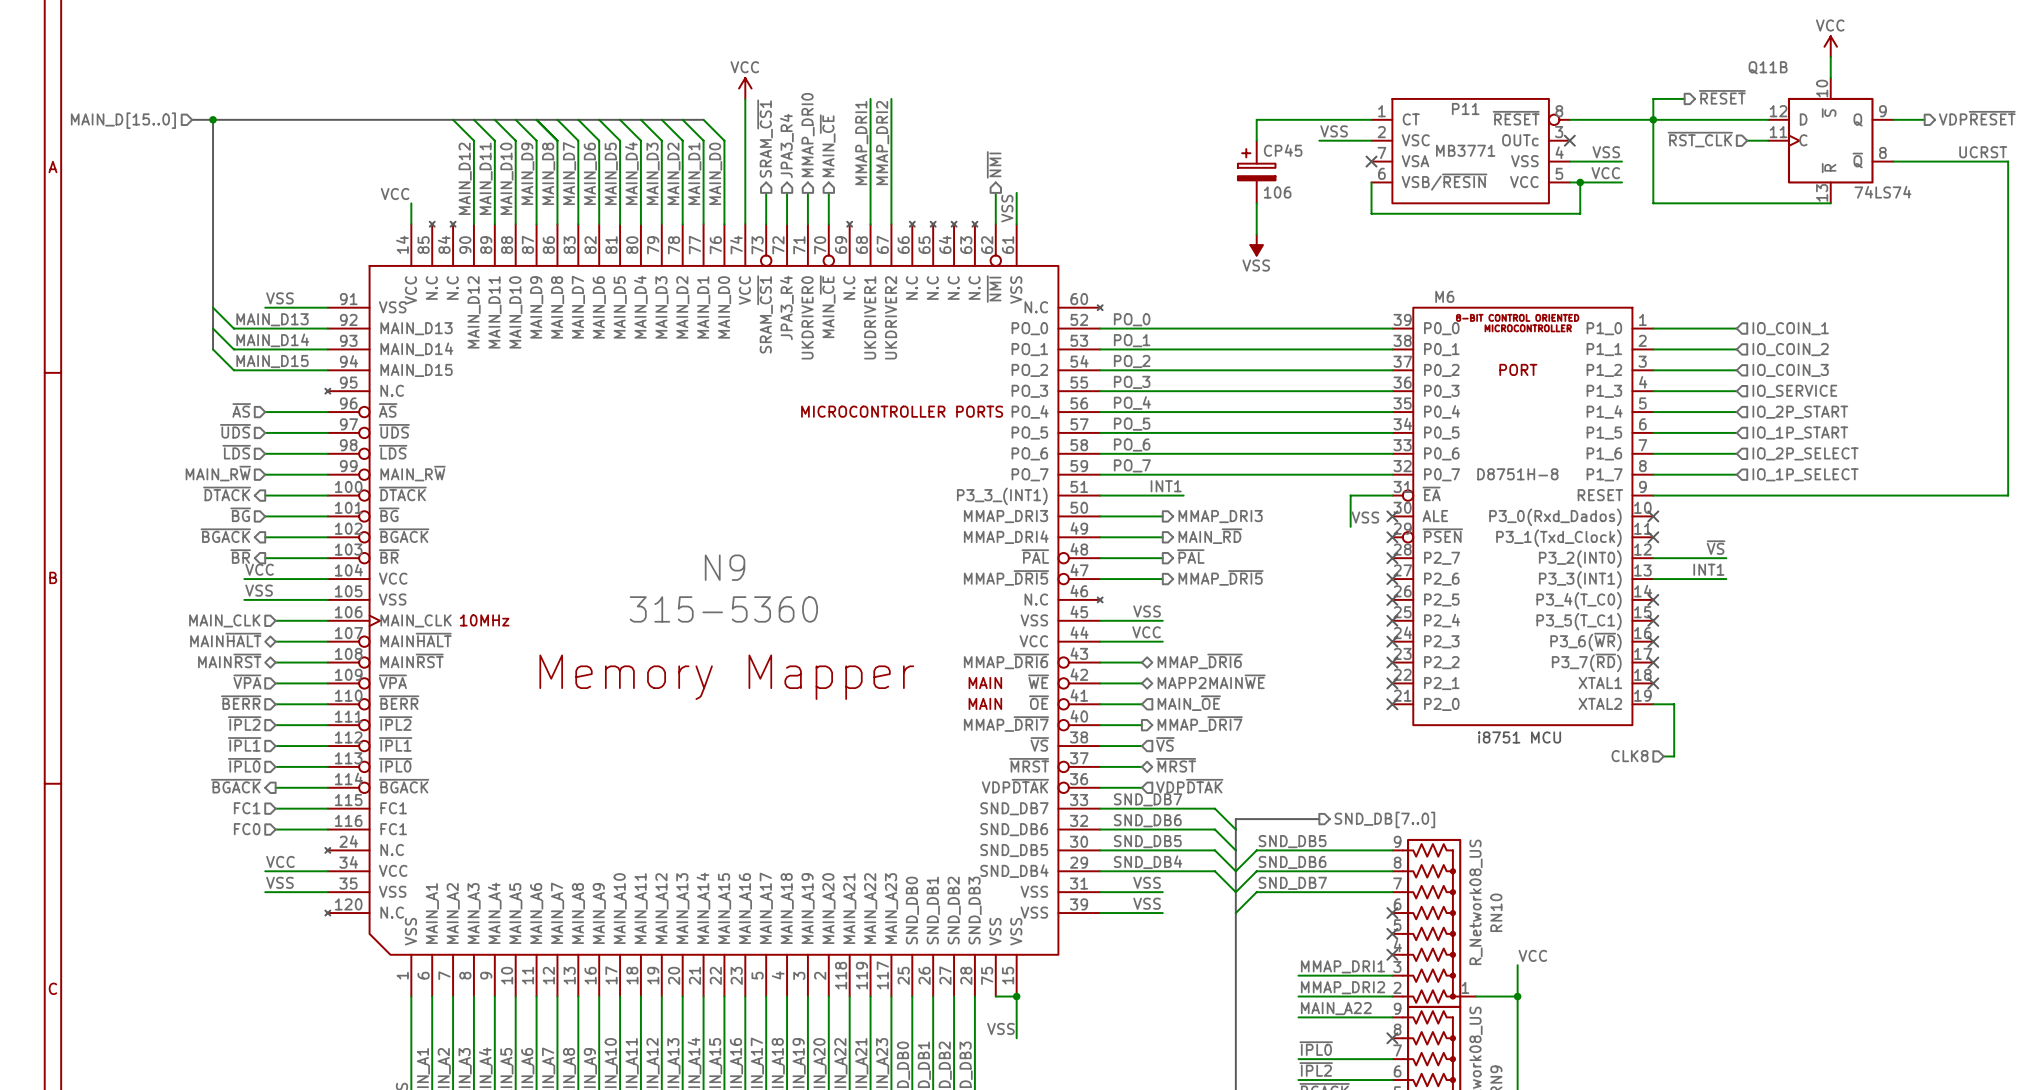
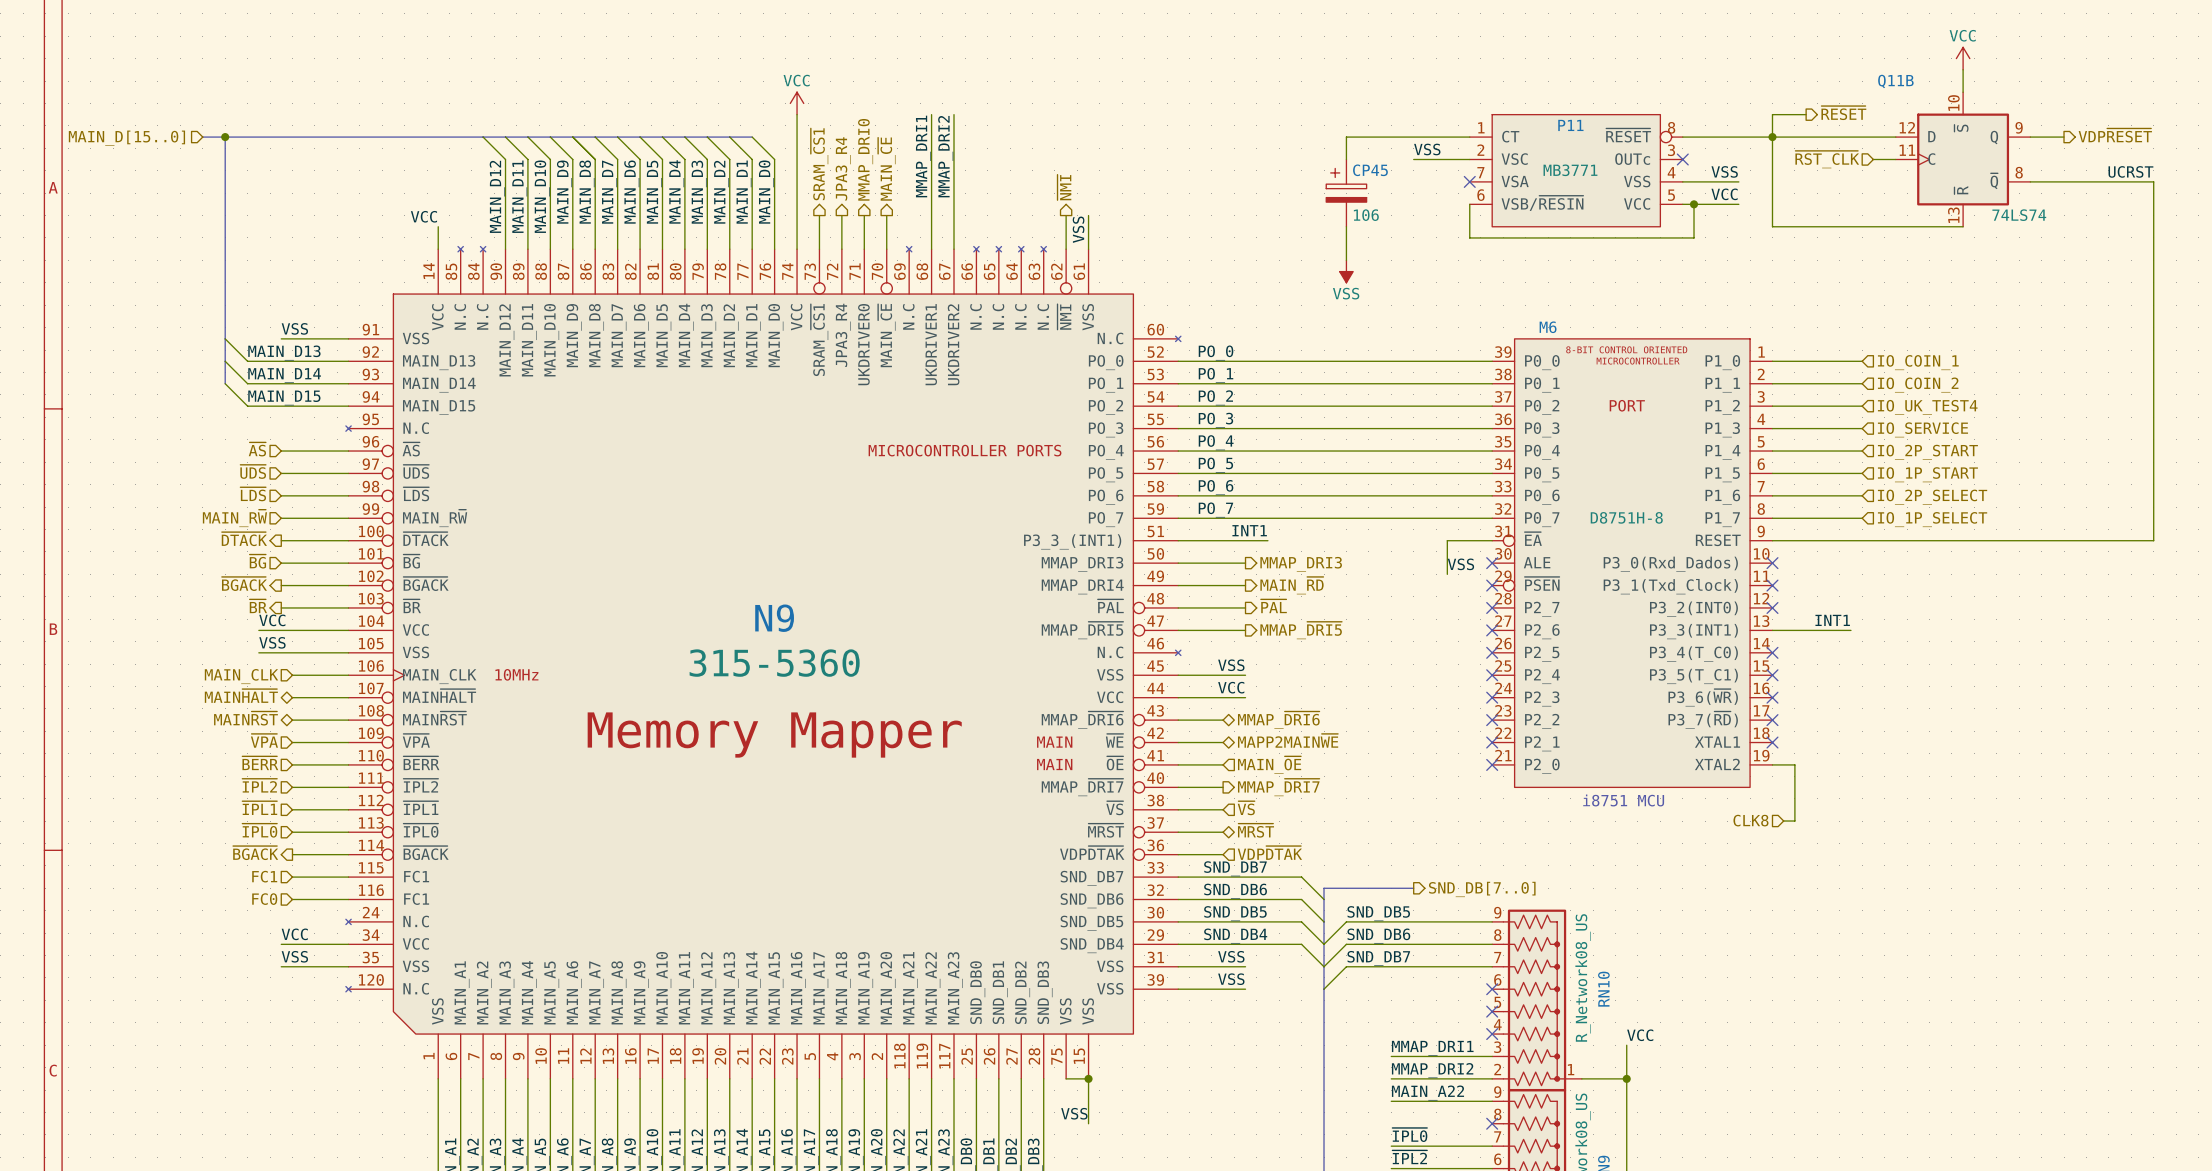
hierarchical label: IO_COIN_3 (1790, 370) -> IO_UK_TEST4 (1927, 407)
label: ~{VS} (1716, 547) -> none
wire: (1653, 558) (1726, 558) -> none
no-connect mark: none -> (1772, 607)

